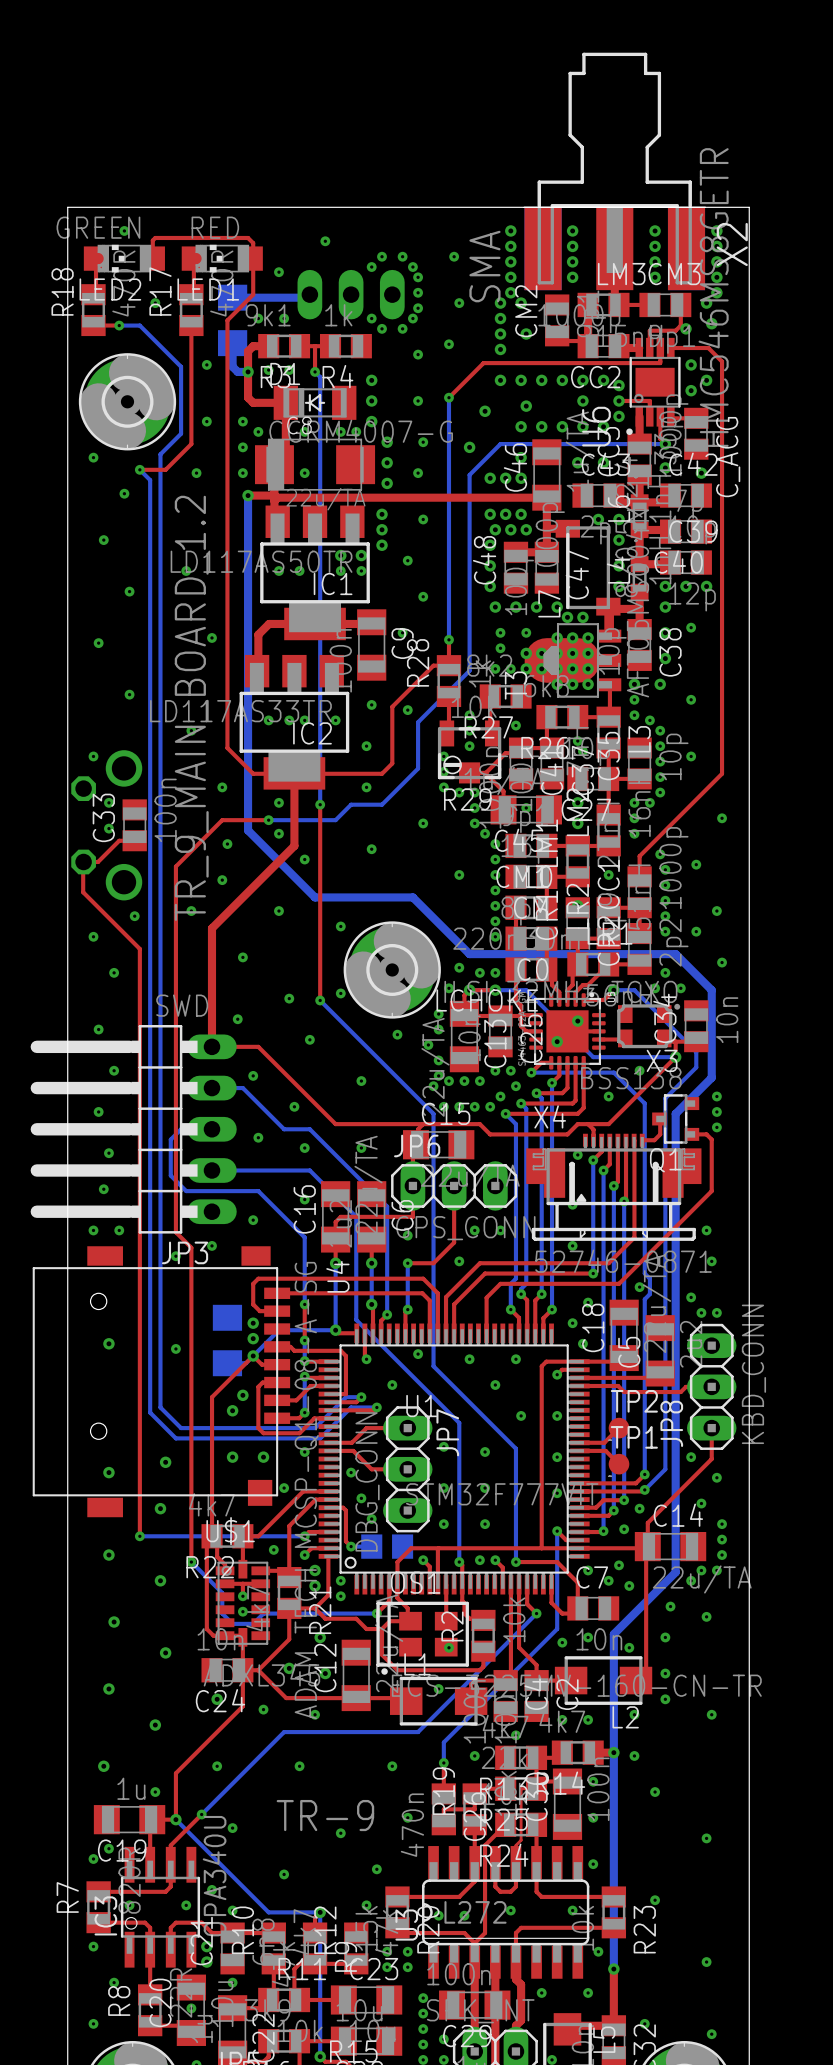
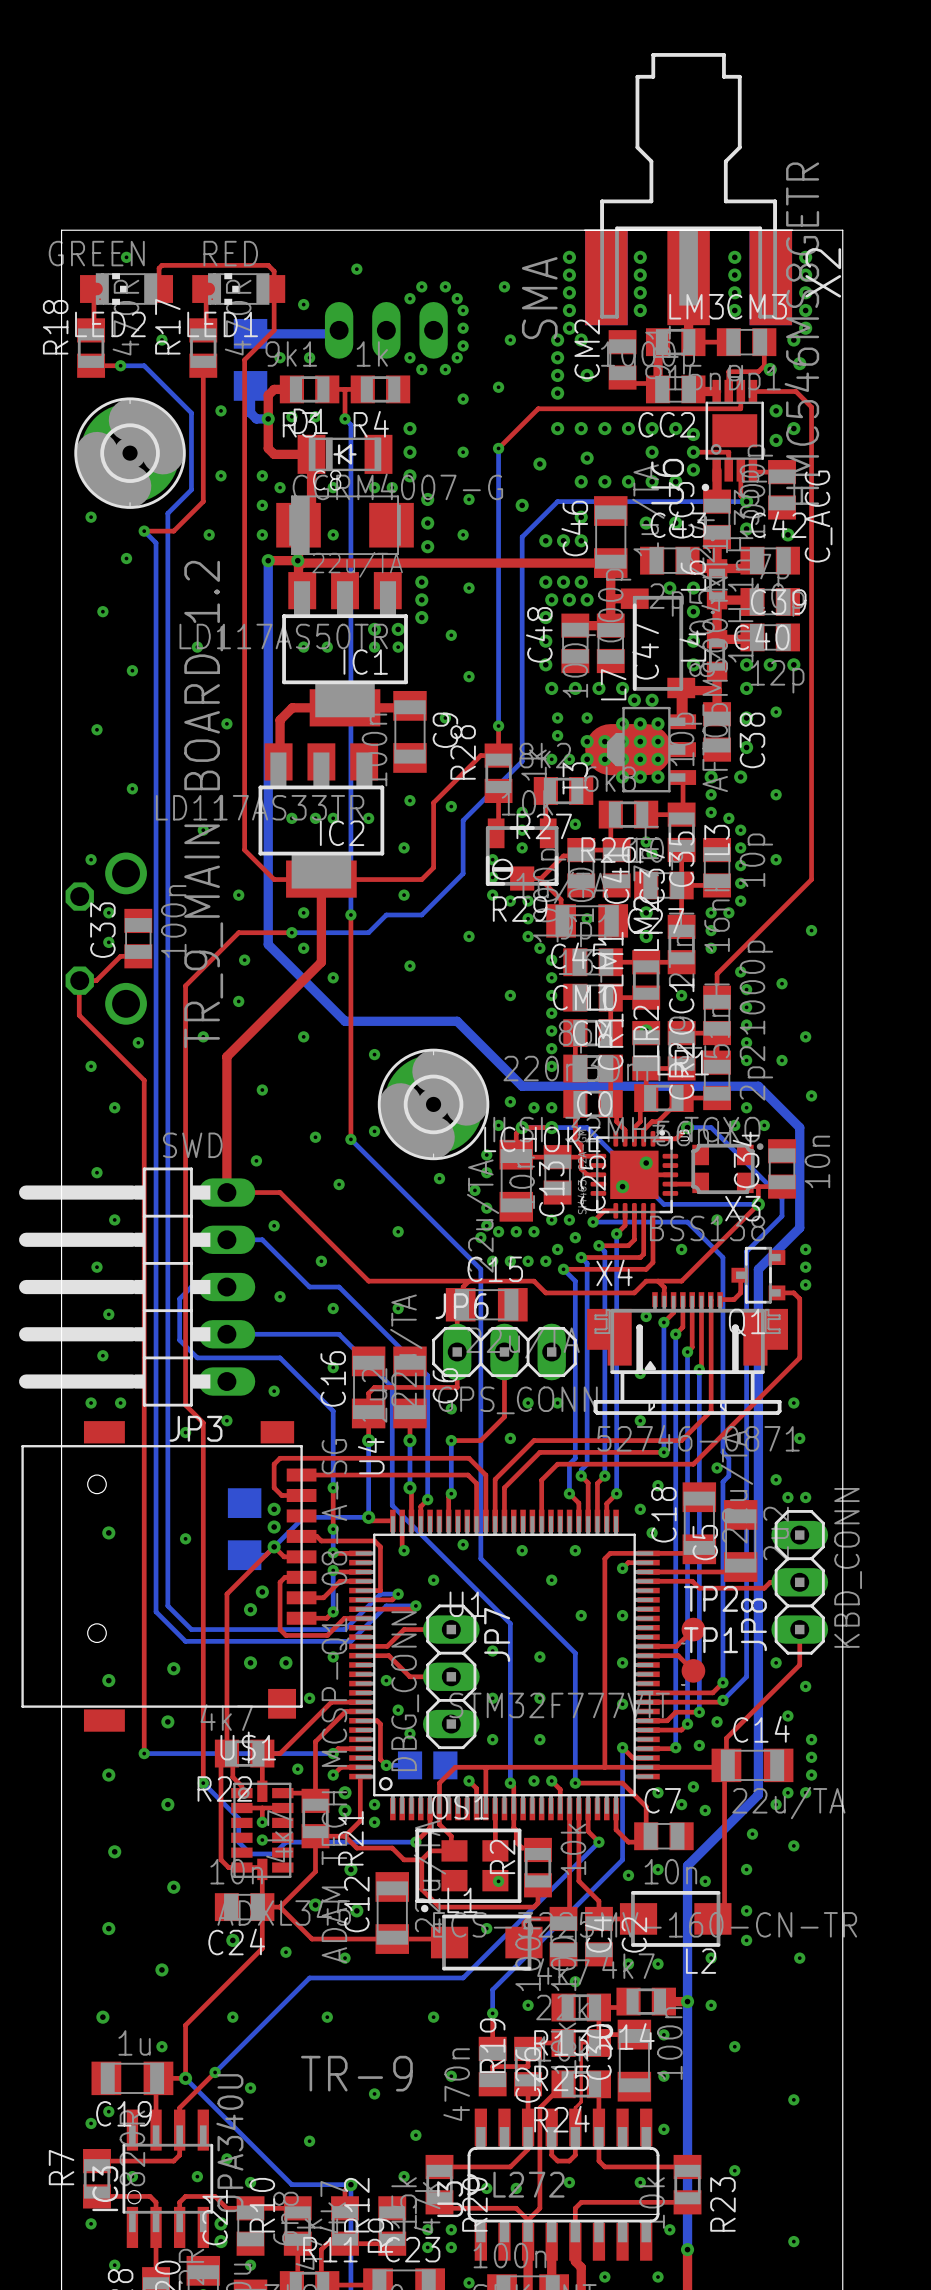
via: none -> (297, 560)

